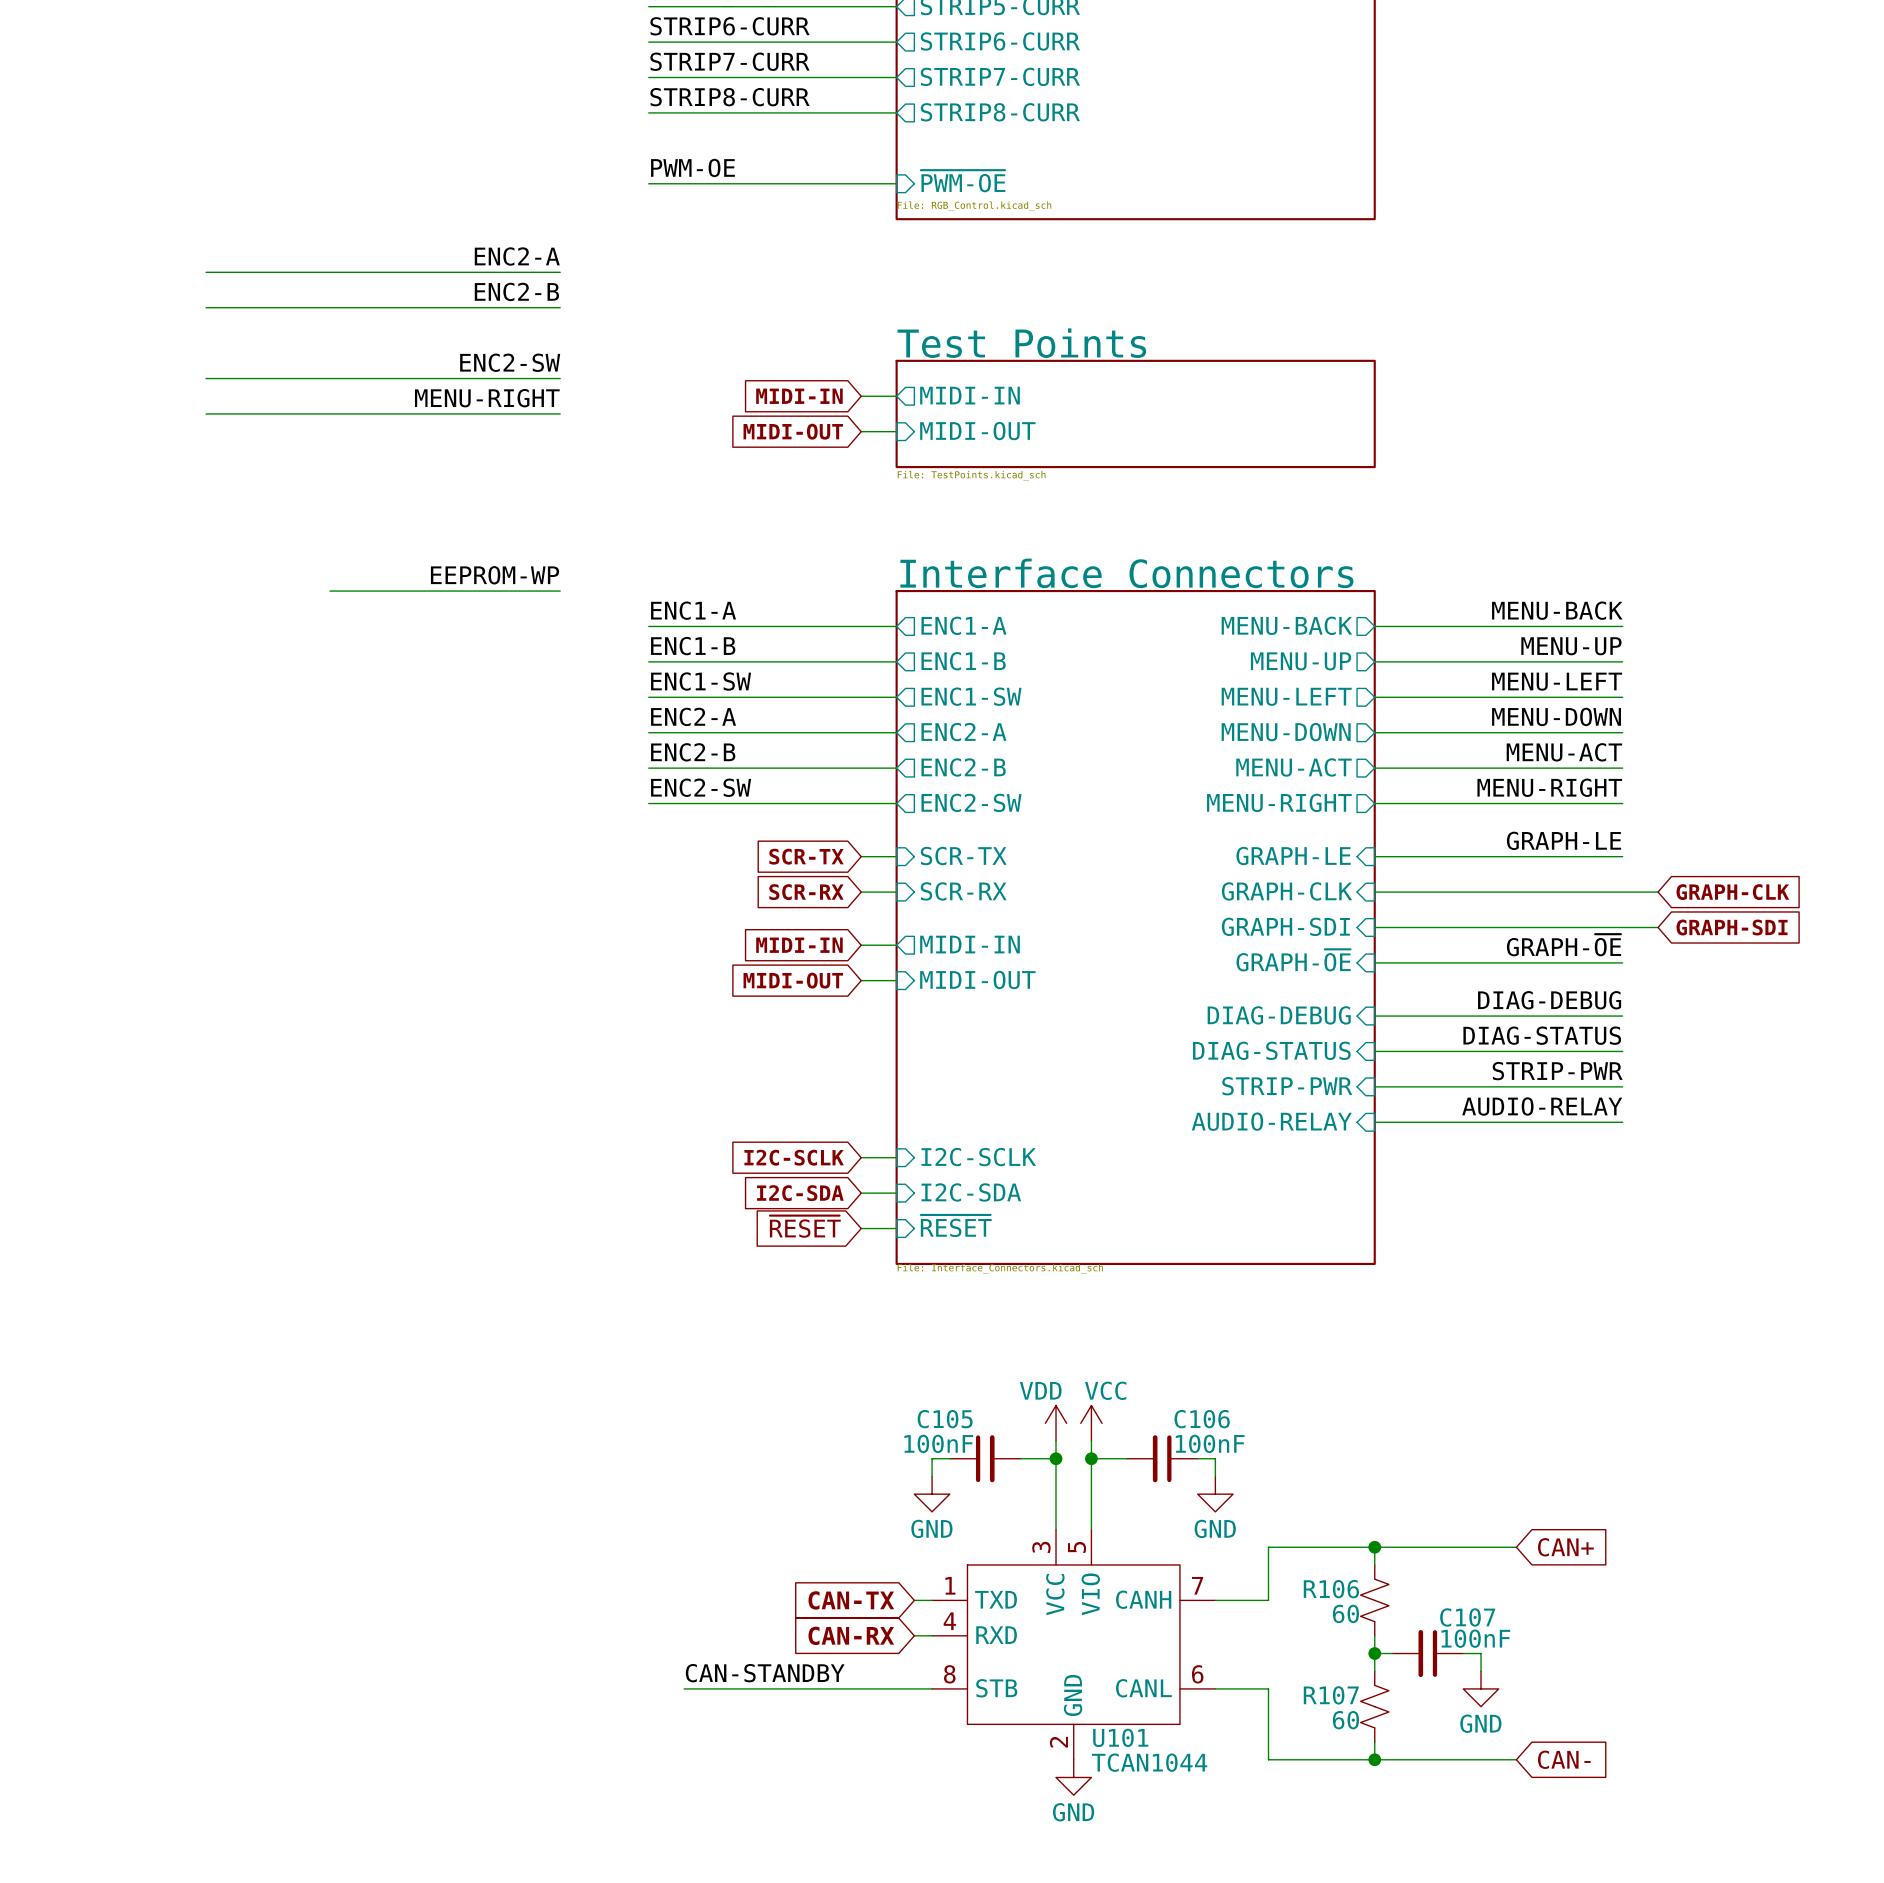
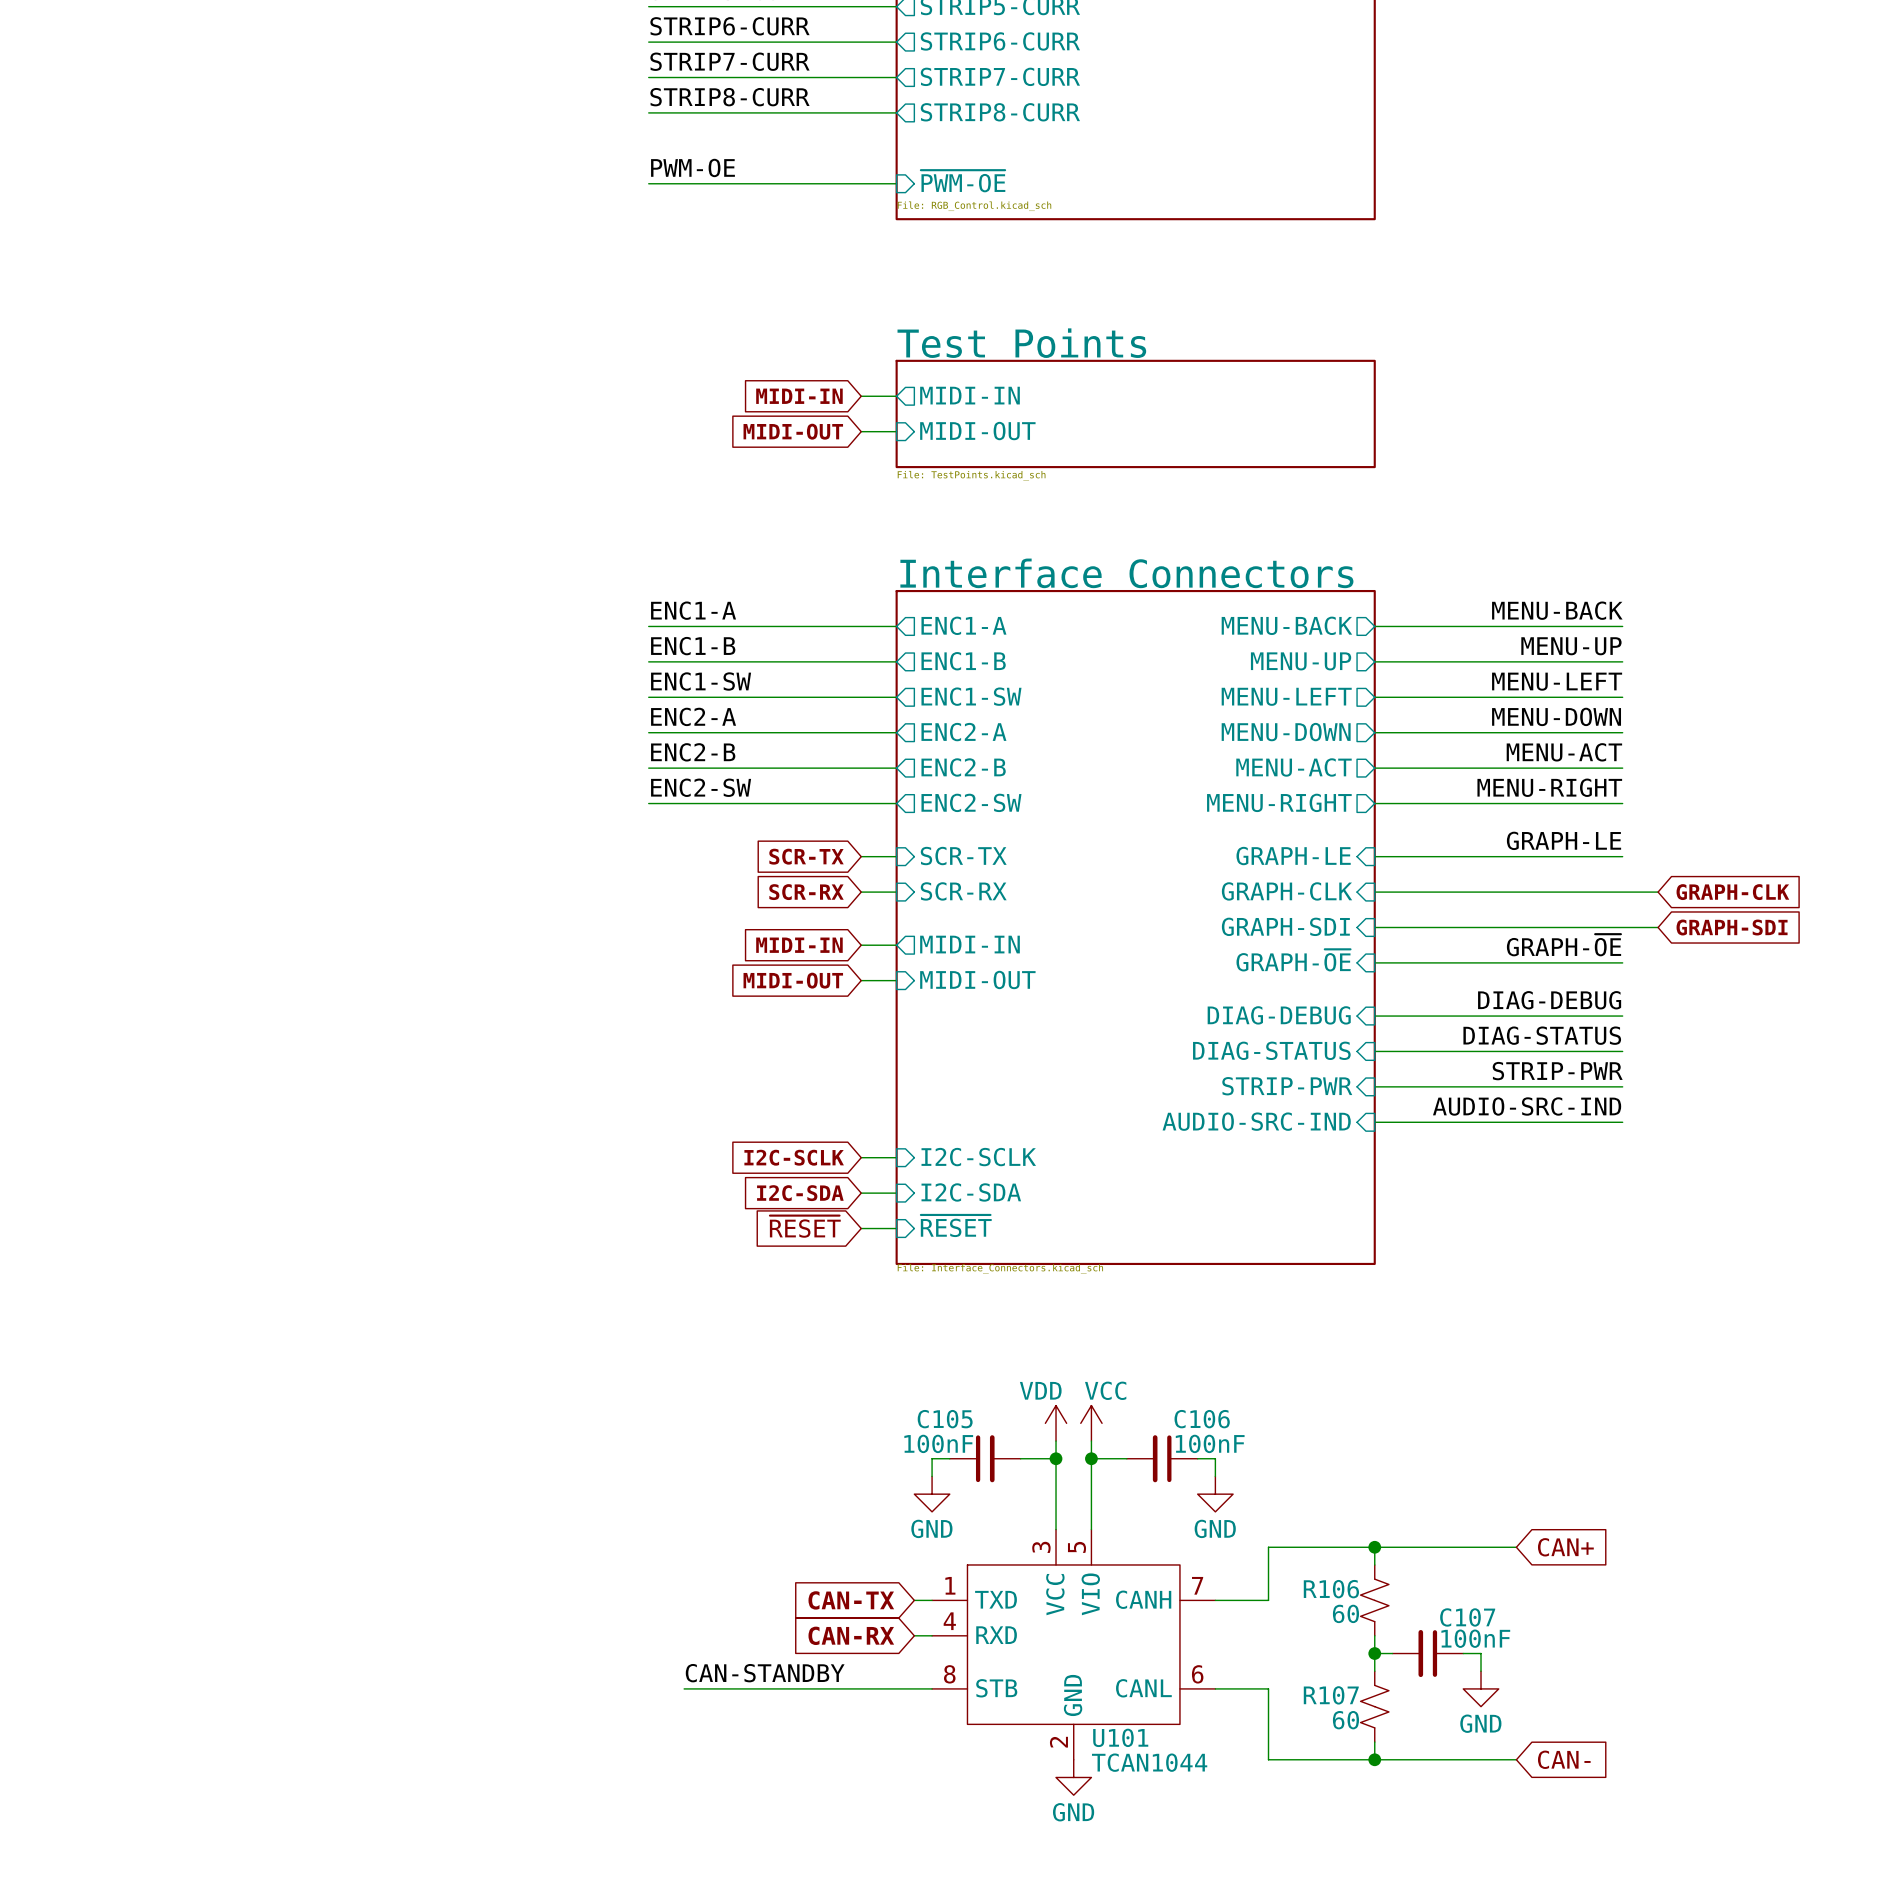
label: ENC2-A (517, 256) -> none
wire: (206, 272) (560, 272) -> none
label: ENC2-B (516, 291) -> none
wire: (206, 307) (560, 307) -> none
label: ENC2-SW (510, 362) -> none
wire: (206, 378) (560, 378) -> none
label: MENU-RIGHT (487, 398) -> none
wire: (206, 413) (560, 413) -> none
label: EEPROM-WP (495, 575) -> none
wire: (329, 591) (560, 591) -> none
label: AUDIO-RELAY (1542, 1106) -> AUDIO-SRC-IND (1527, 1106)
sheet pin: AUDIO-RELAY (1271, 1121) -> AUDIO-SRC-IND (1256, 1121)

